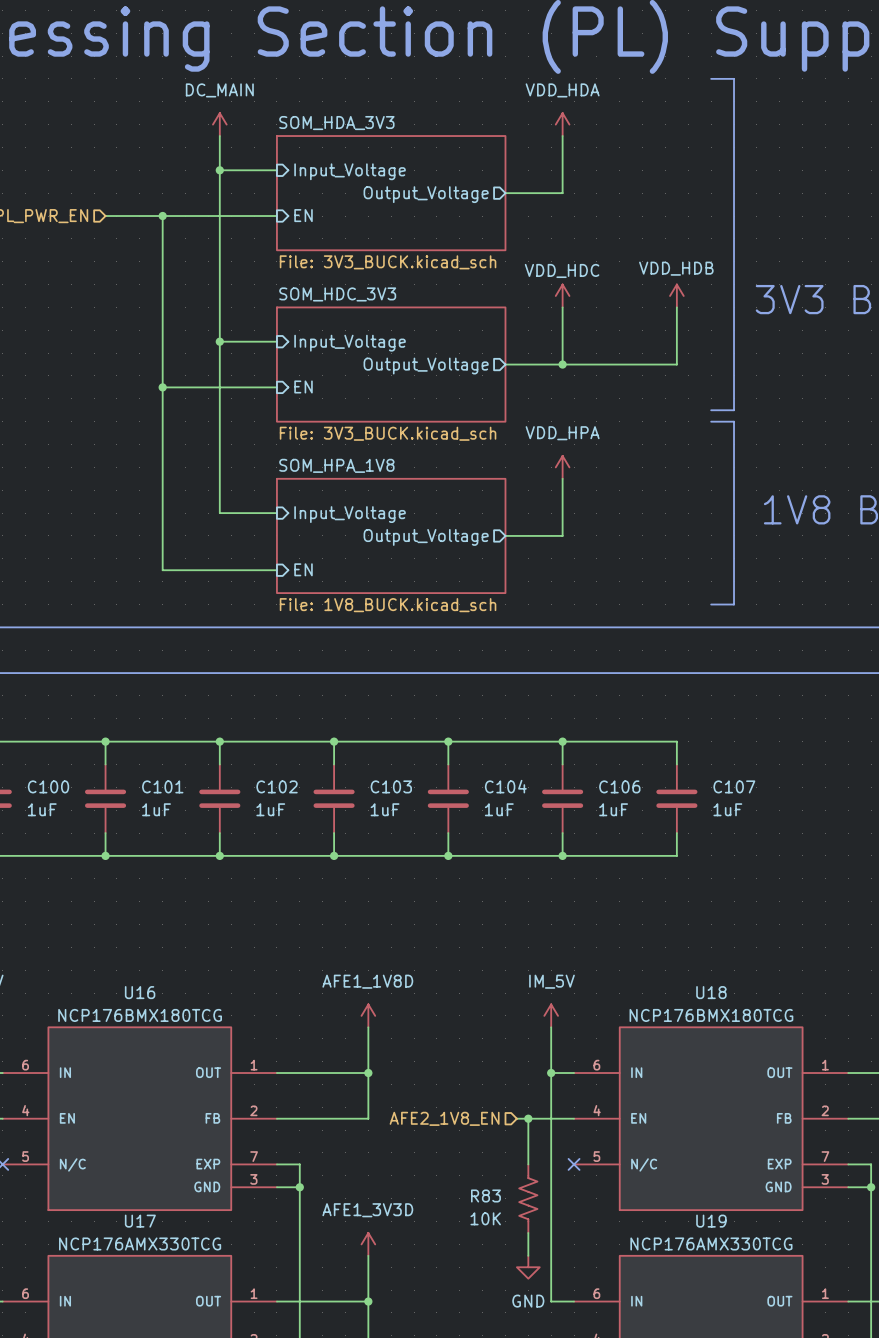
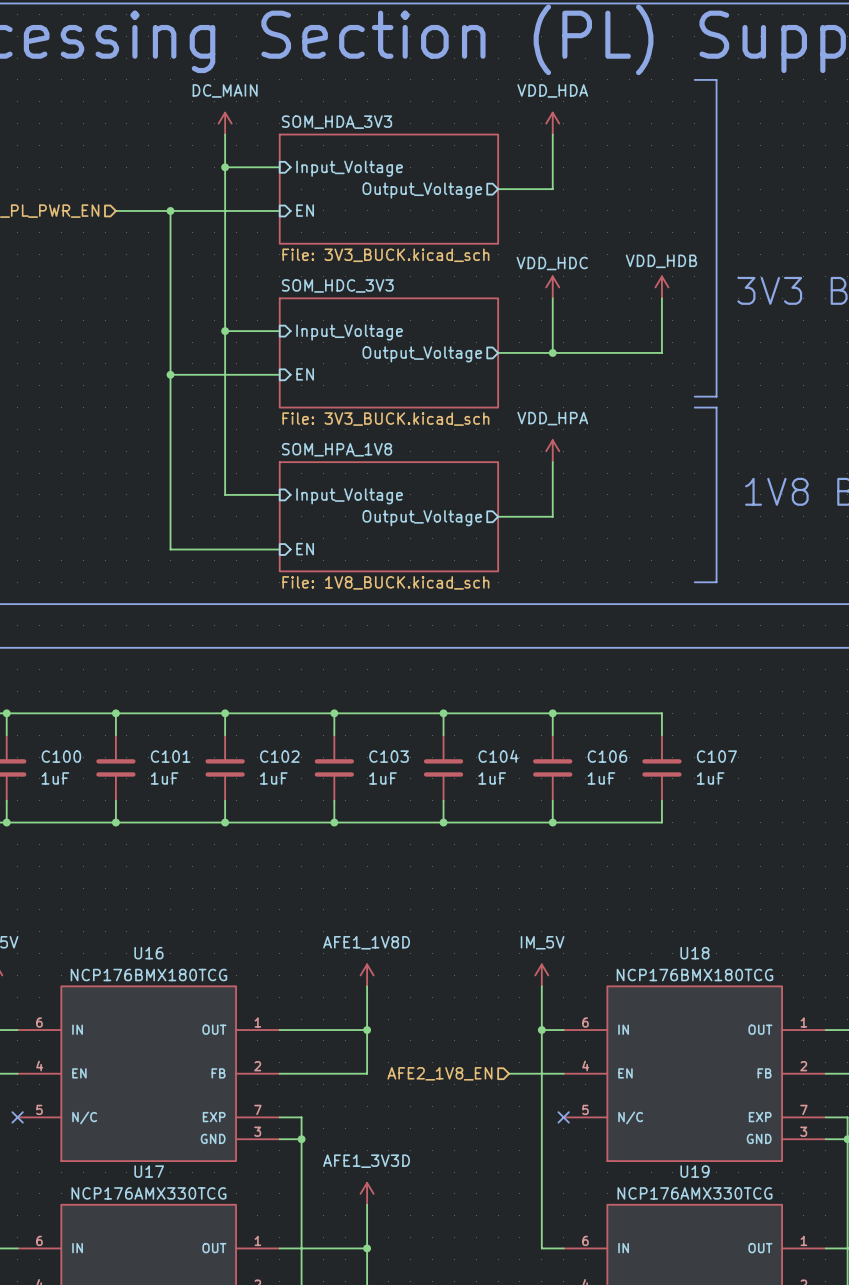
wire: (528, 1118) (528, 1164) -> none
junction: (528, 1118) -> none
R83: 10K (528, 1198) -> none
wire: (528, 1232) (528, 1255) -> none
power symbol: GND (528, 1267) -> none

